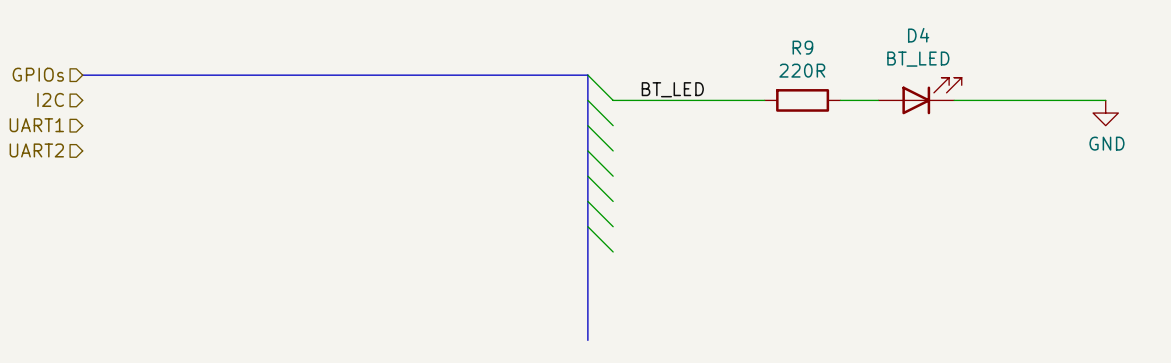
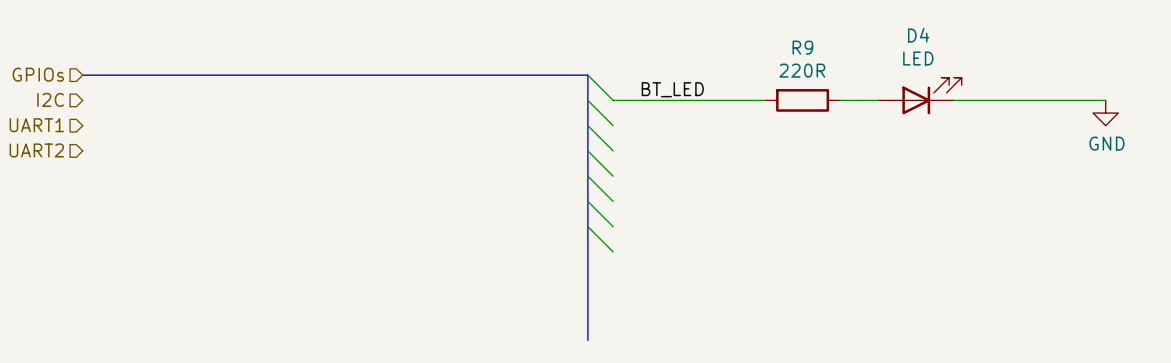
D4 value: BT_LED (918, 59) -> LED (918, 58)

